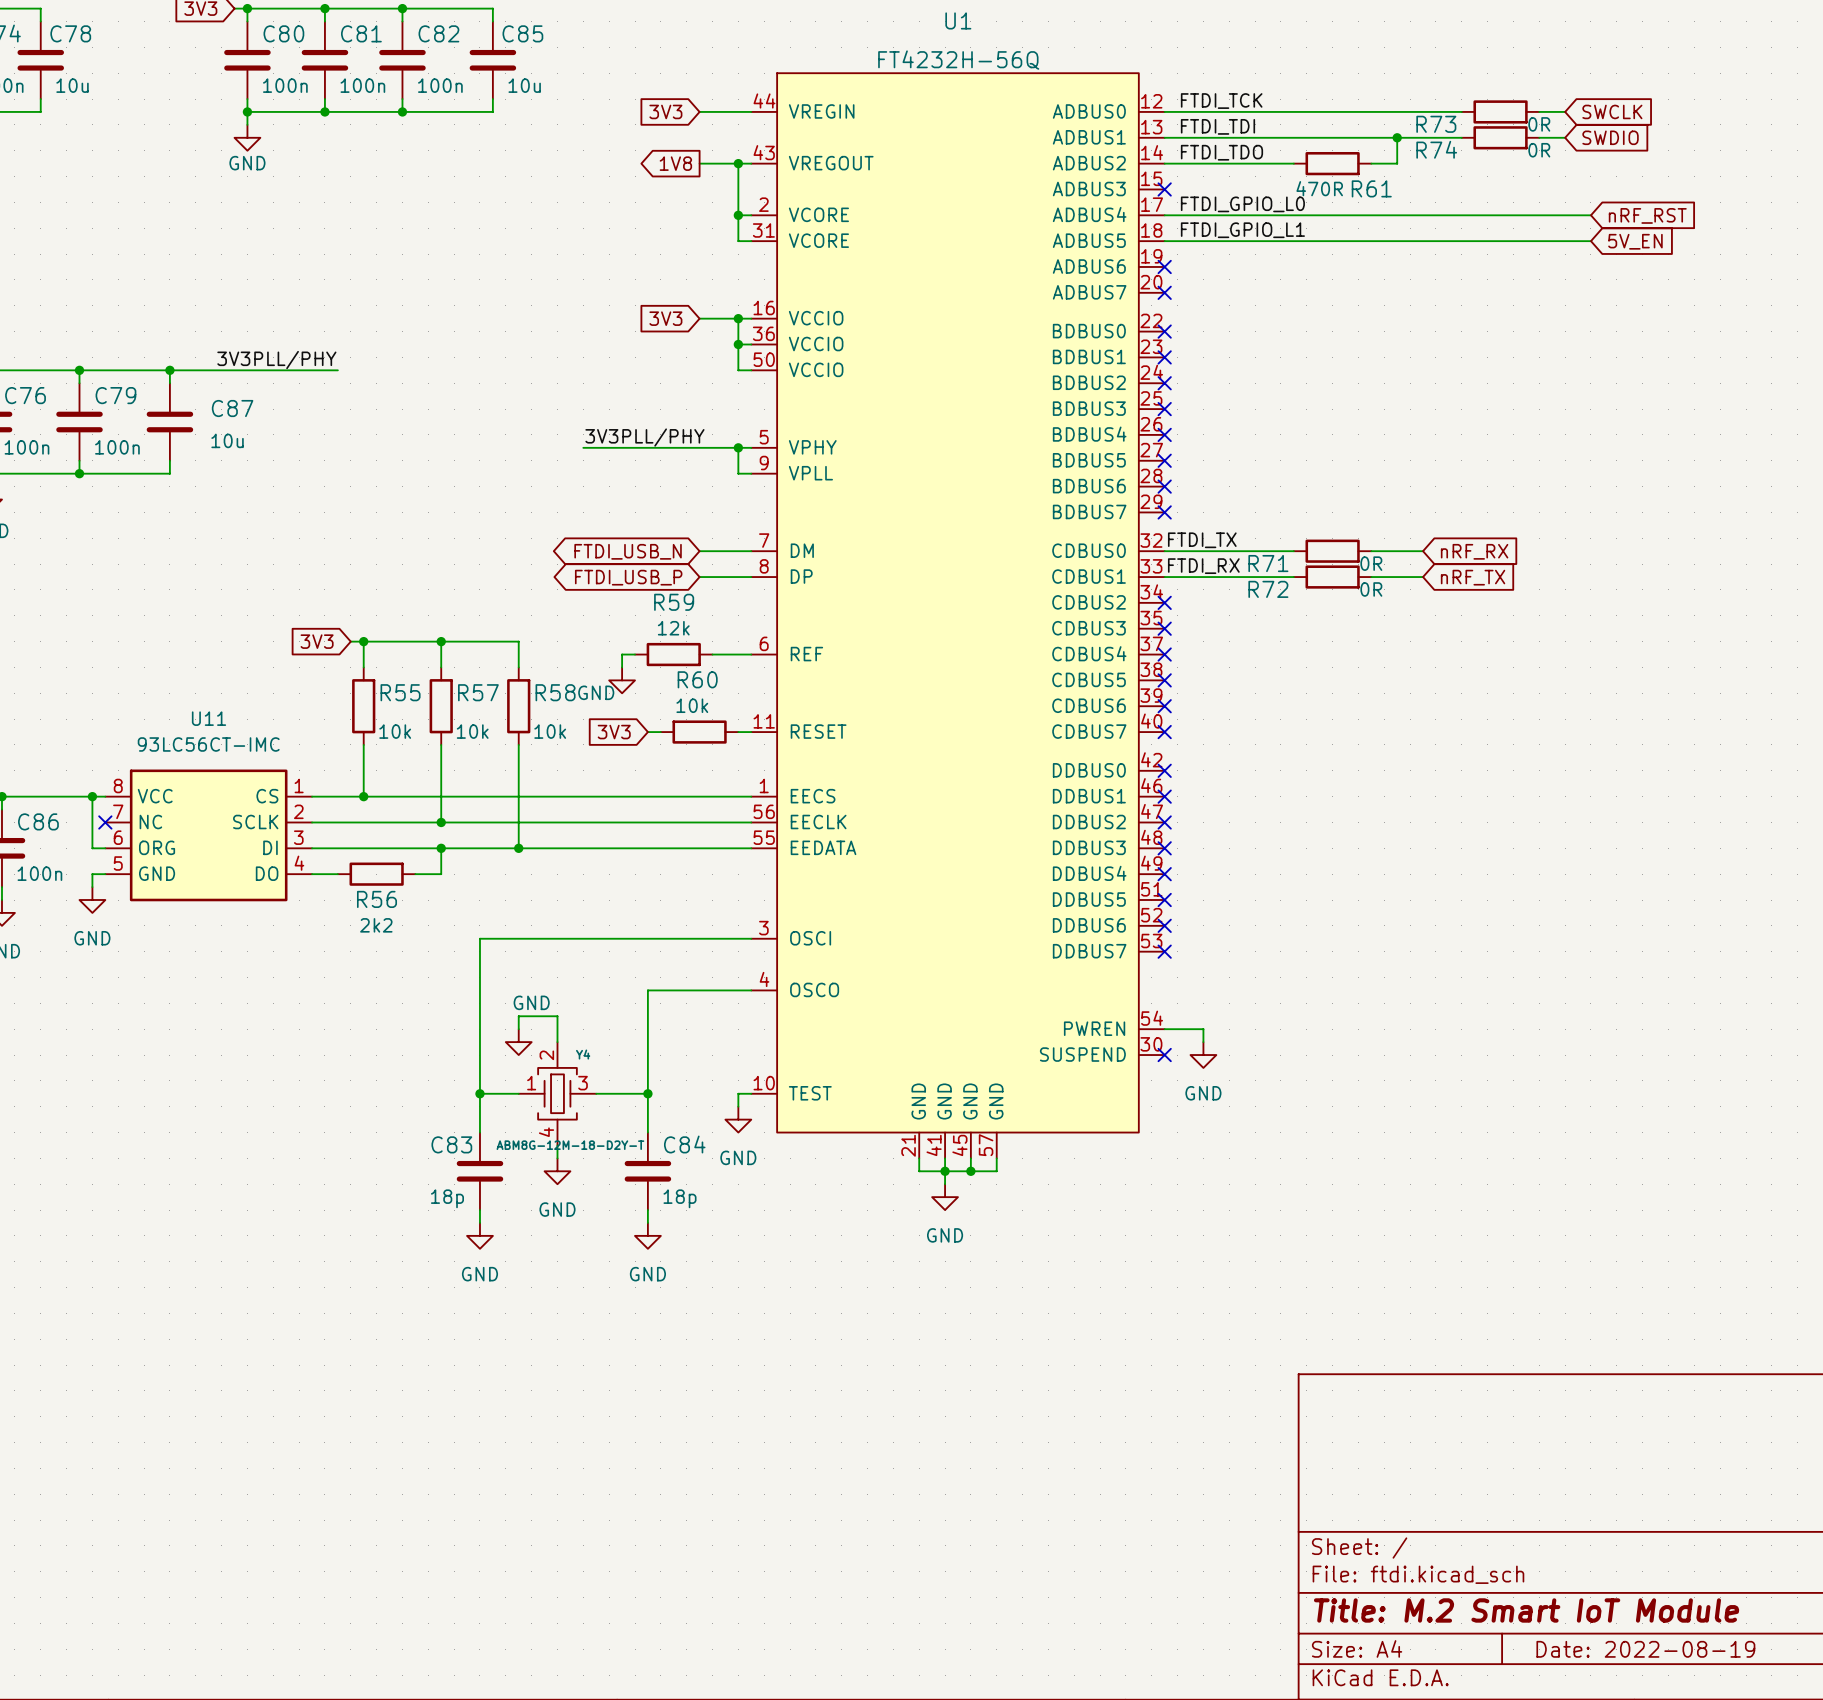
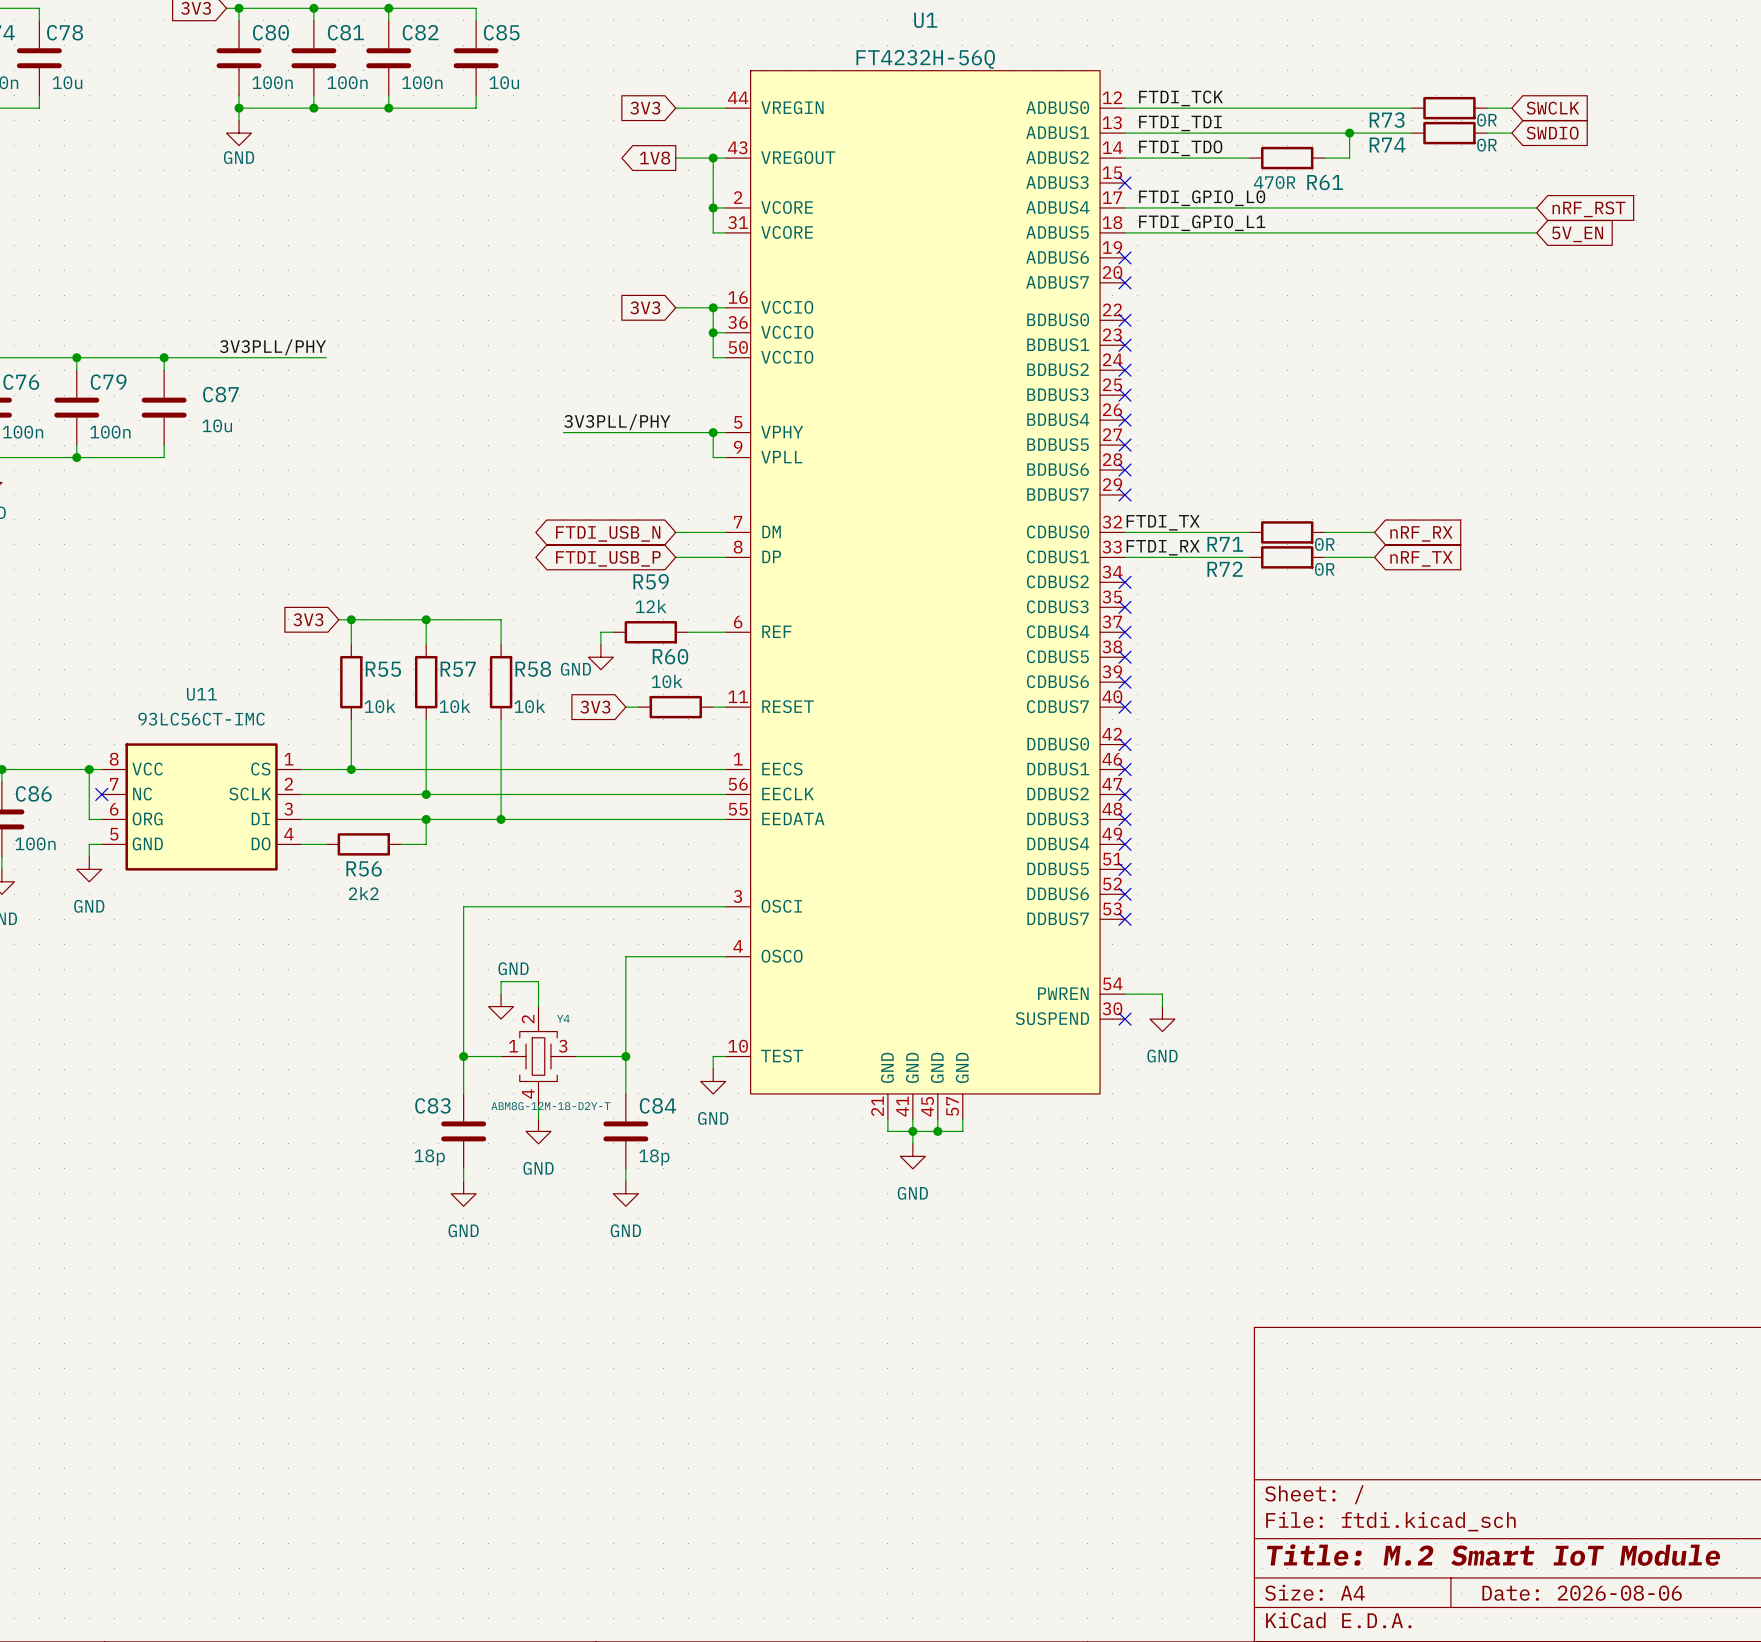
title block: Date: 2022-08-19 (1645, 1649) -> Date: 2026-08-06 (1582, 1593)

